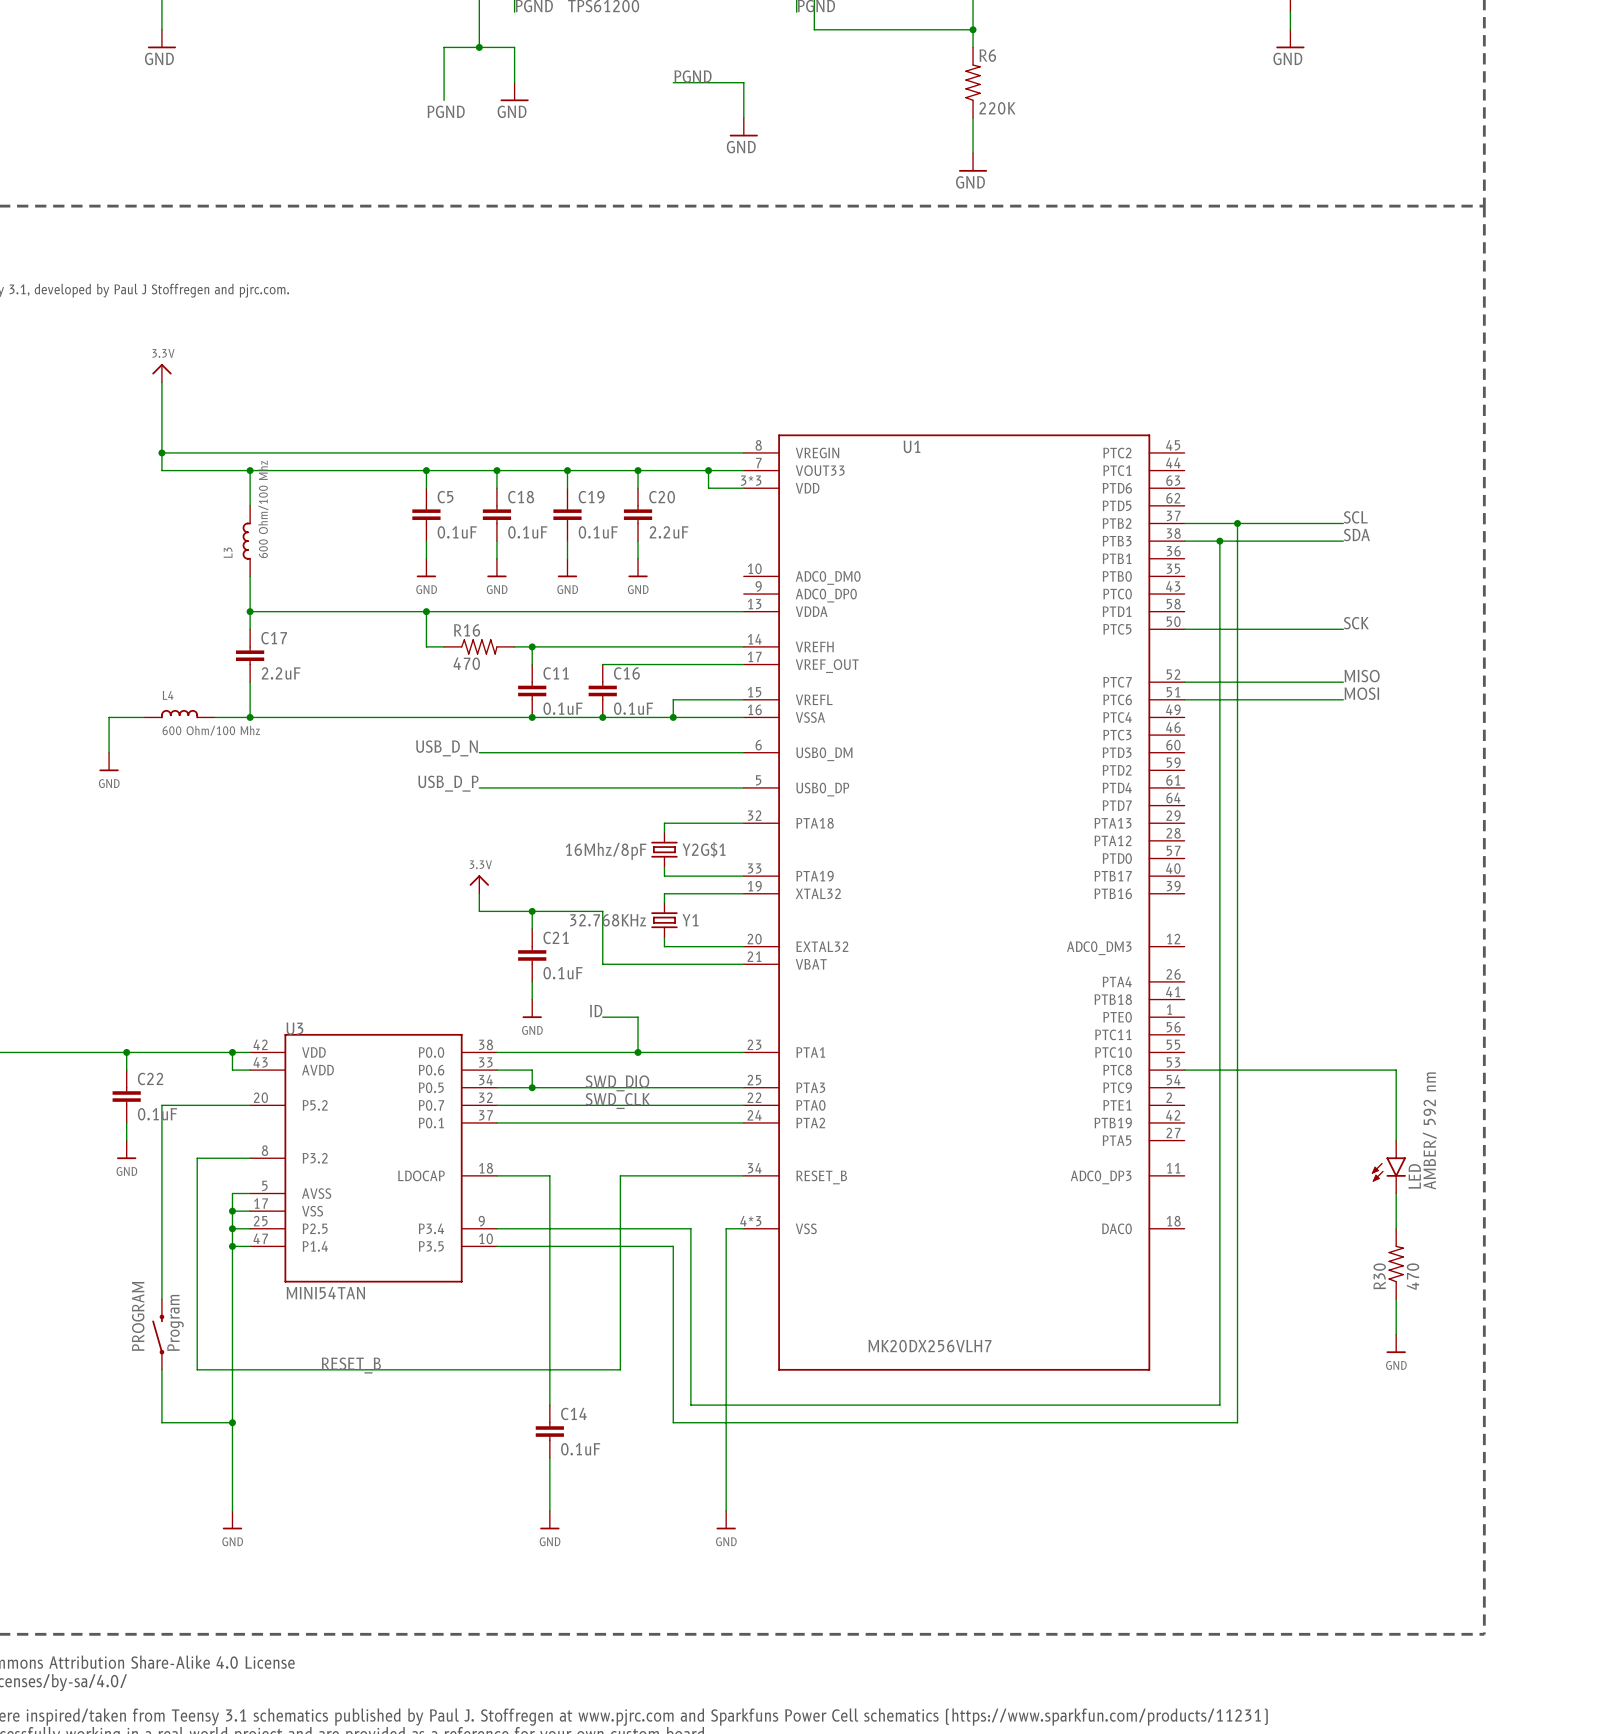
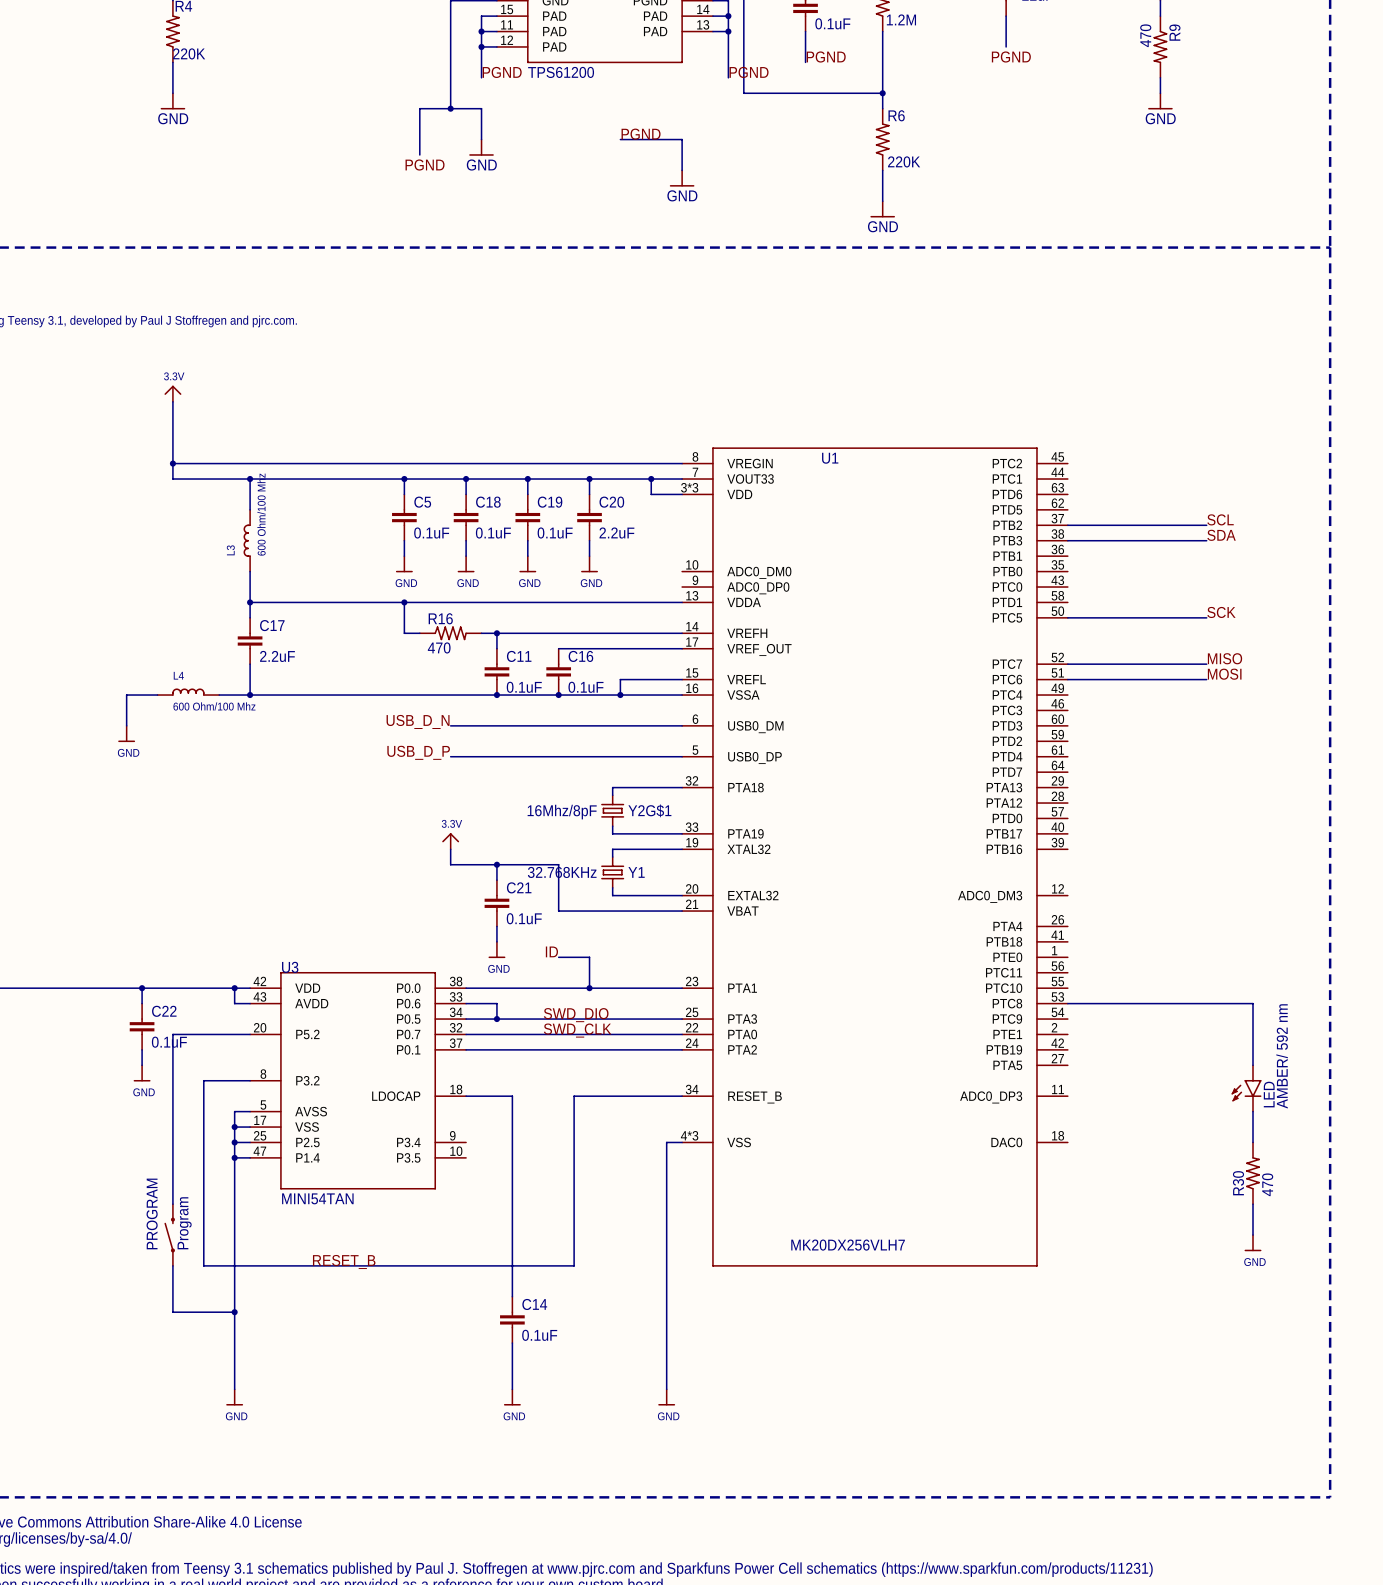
wire: (1237, 523) (1237, 1422) (673, 1422) (673, 1246) (496, 1246) -> none
junction: (1237, 523) -> none
wire: (1219, 541) (1219, 1405) (690, 1405) (690, 1228) (496, 1228) -> none
junction: (1219, 541) -> none

